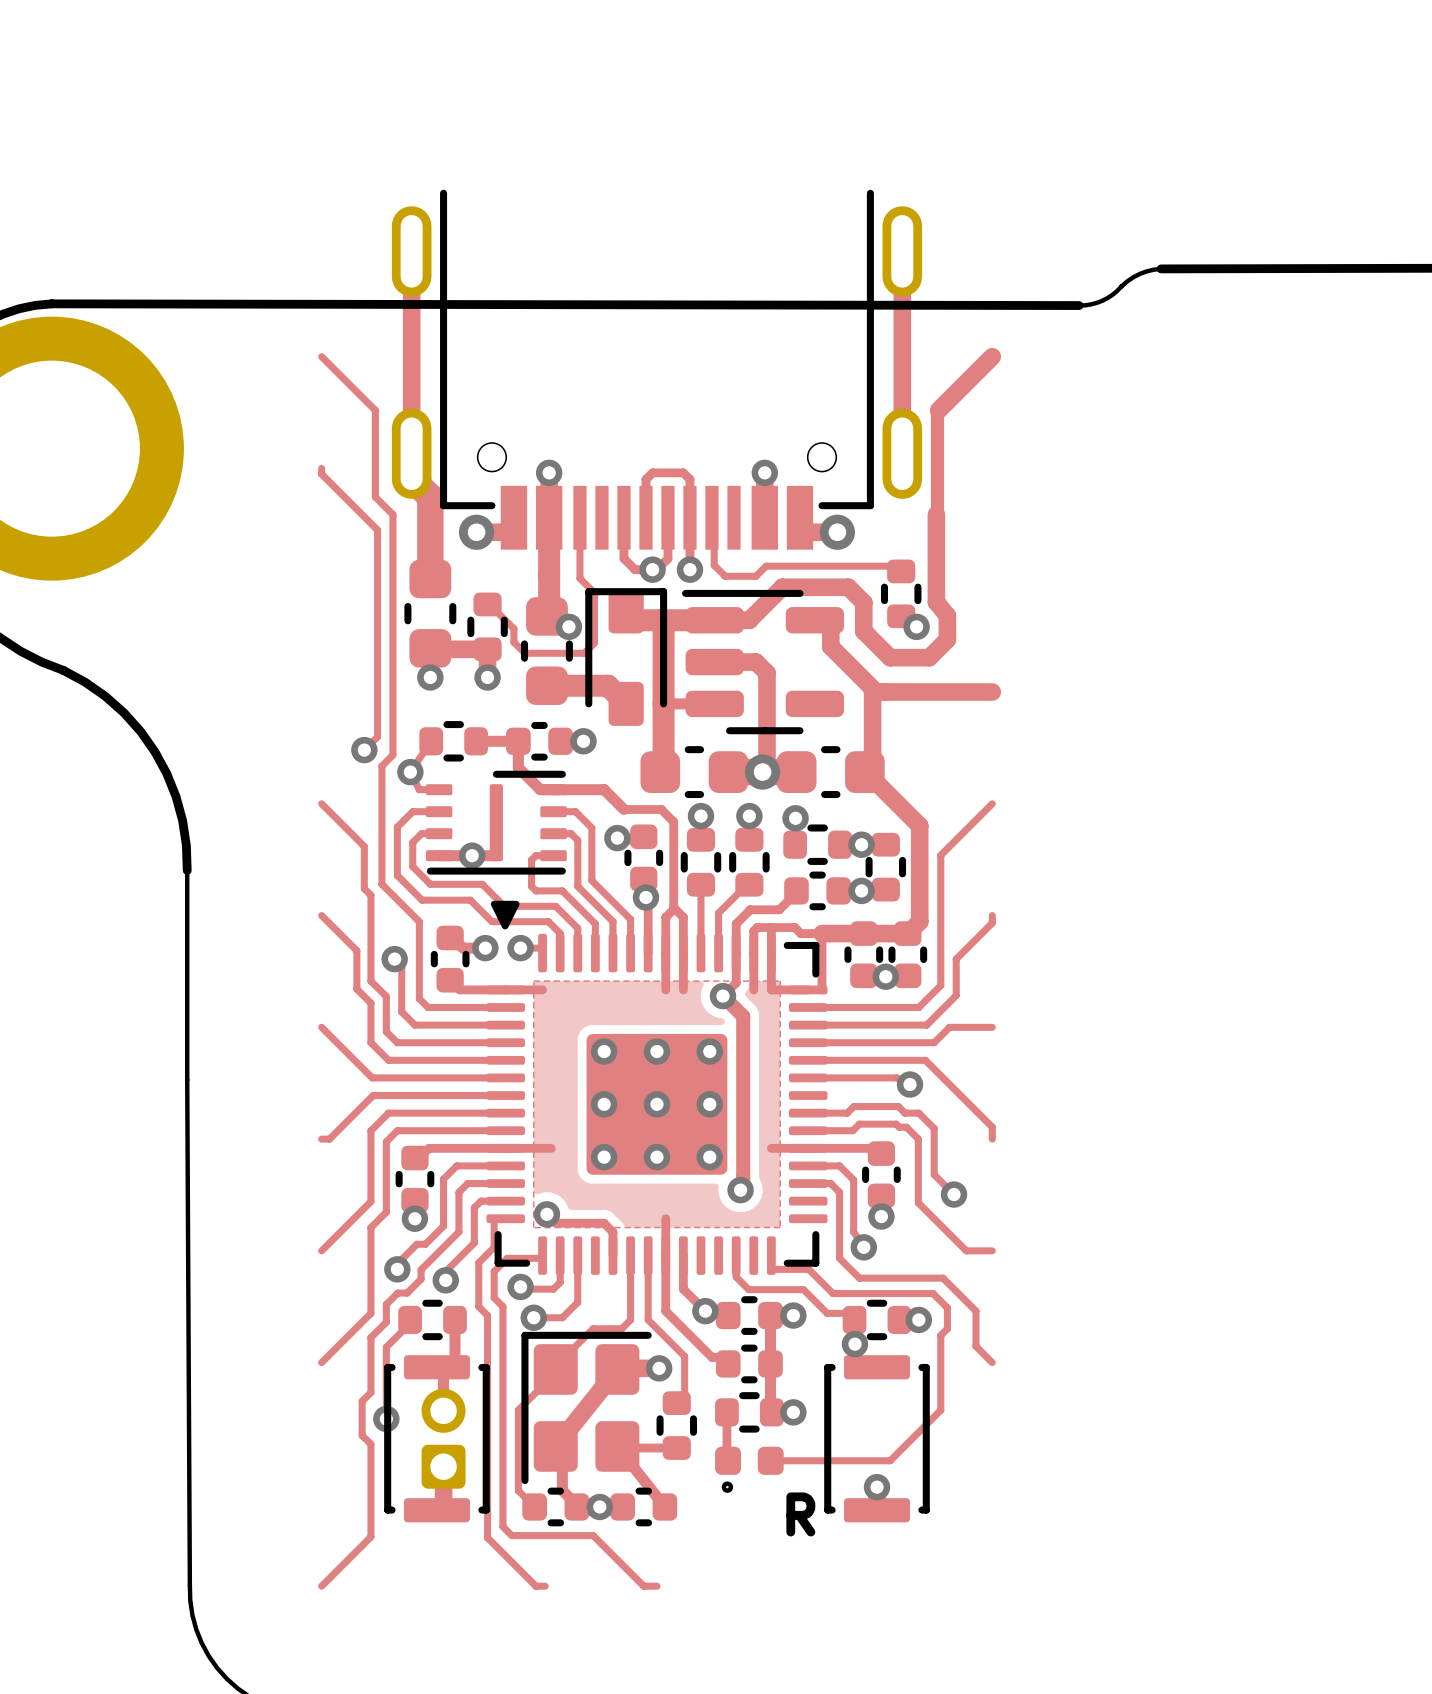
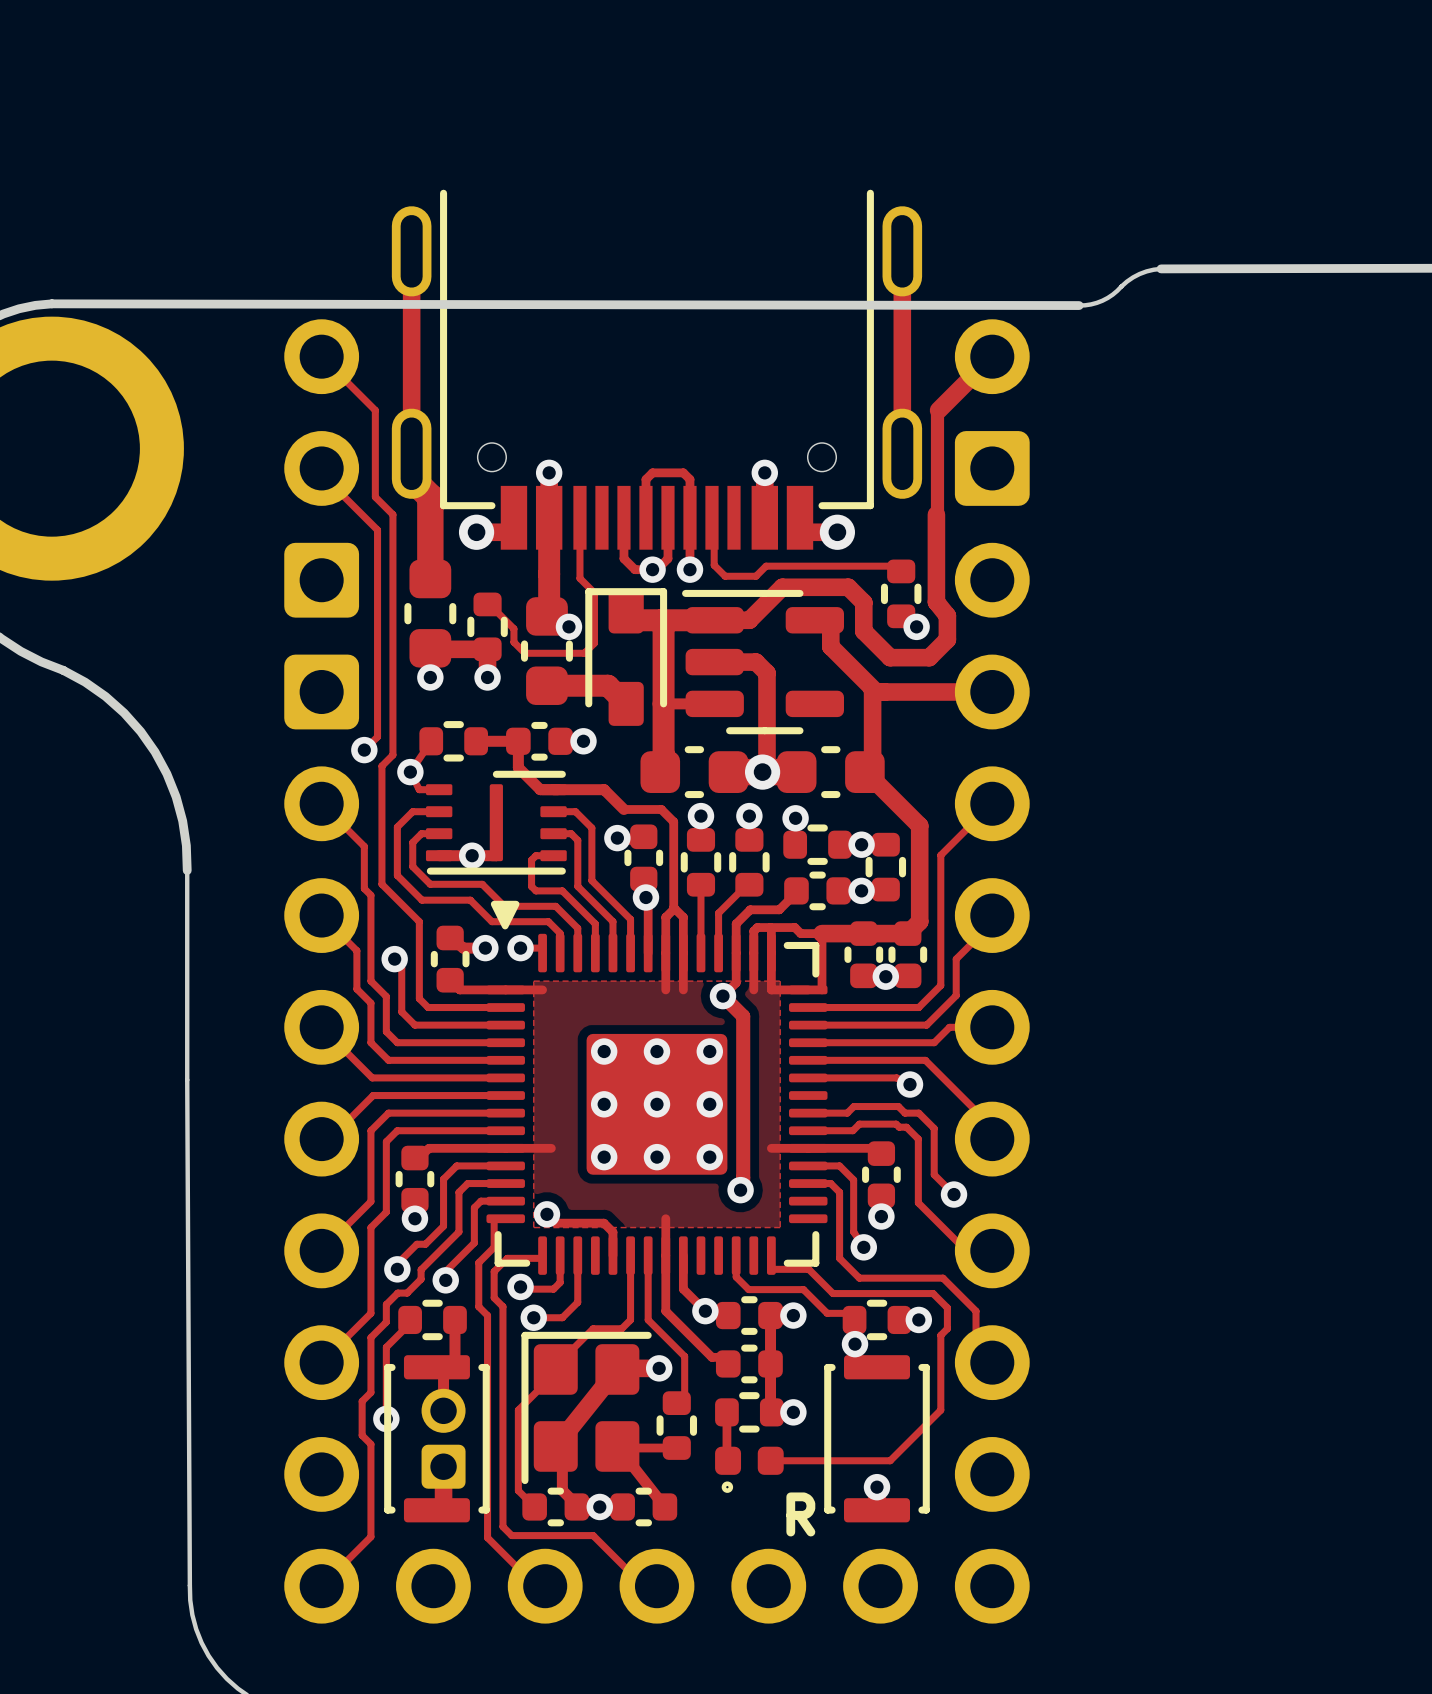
part: none -> (321, 971)
part: none -> (992, 971)
part: none -> (656, 1586)

